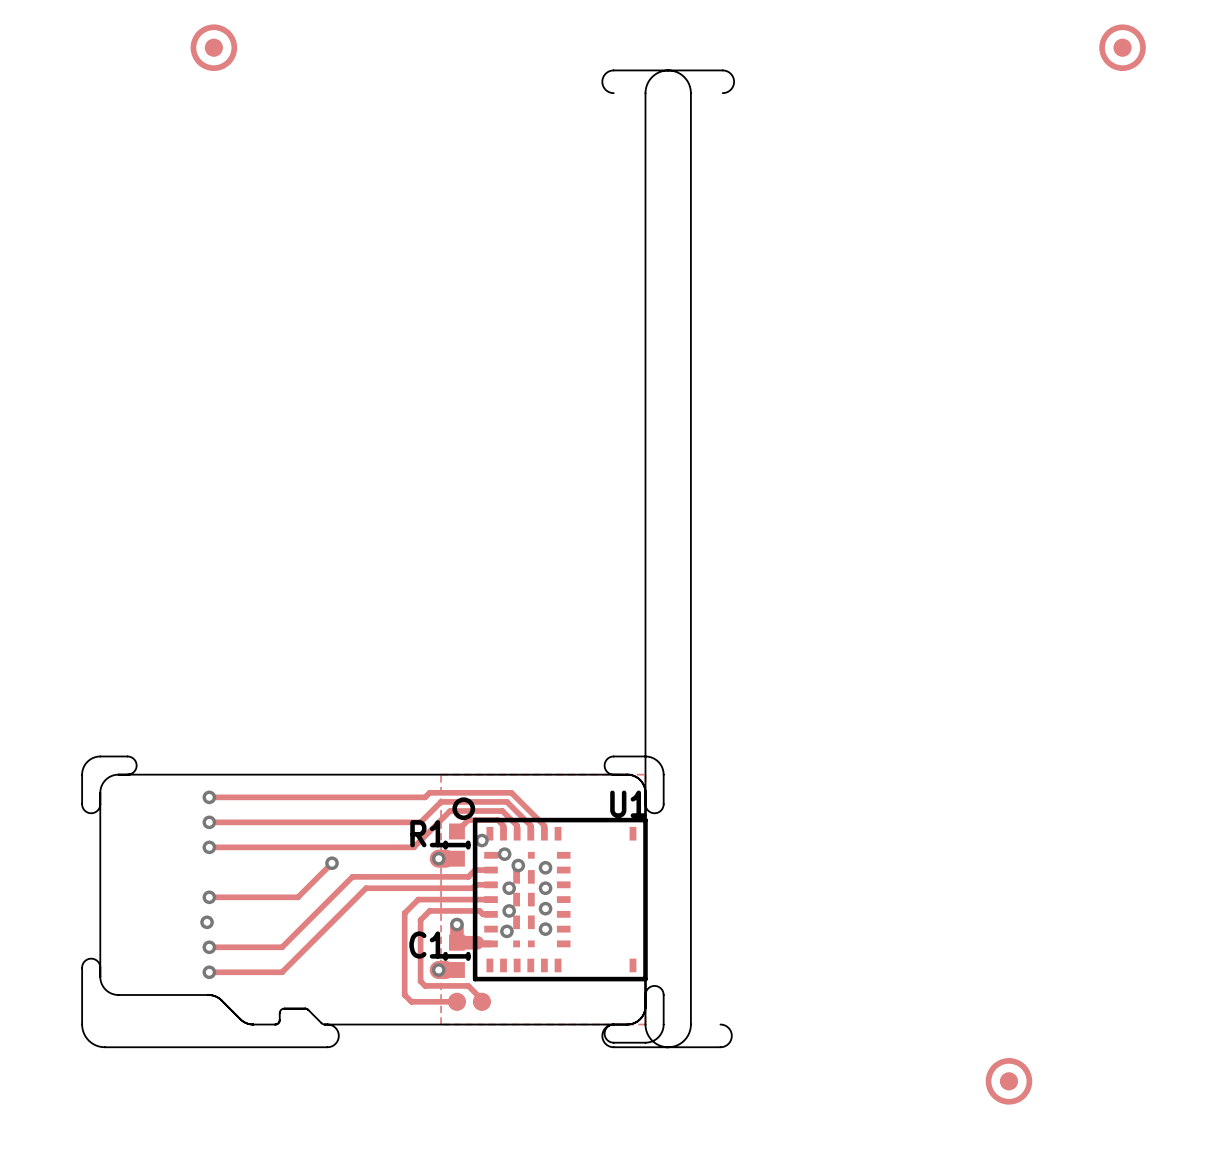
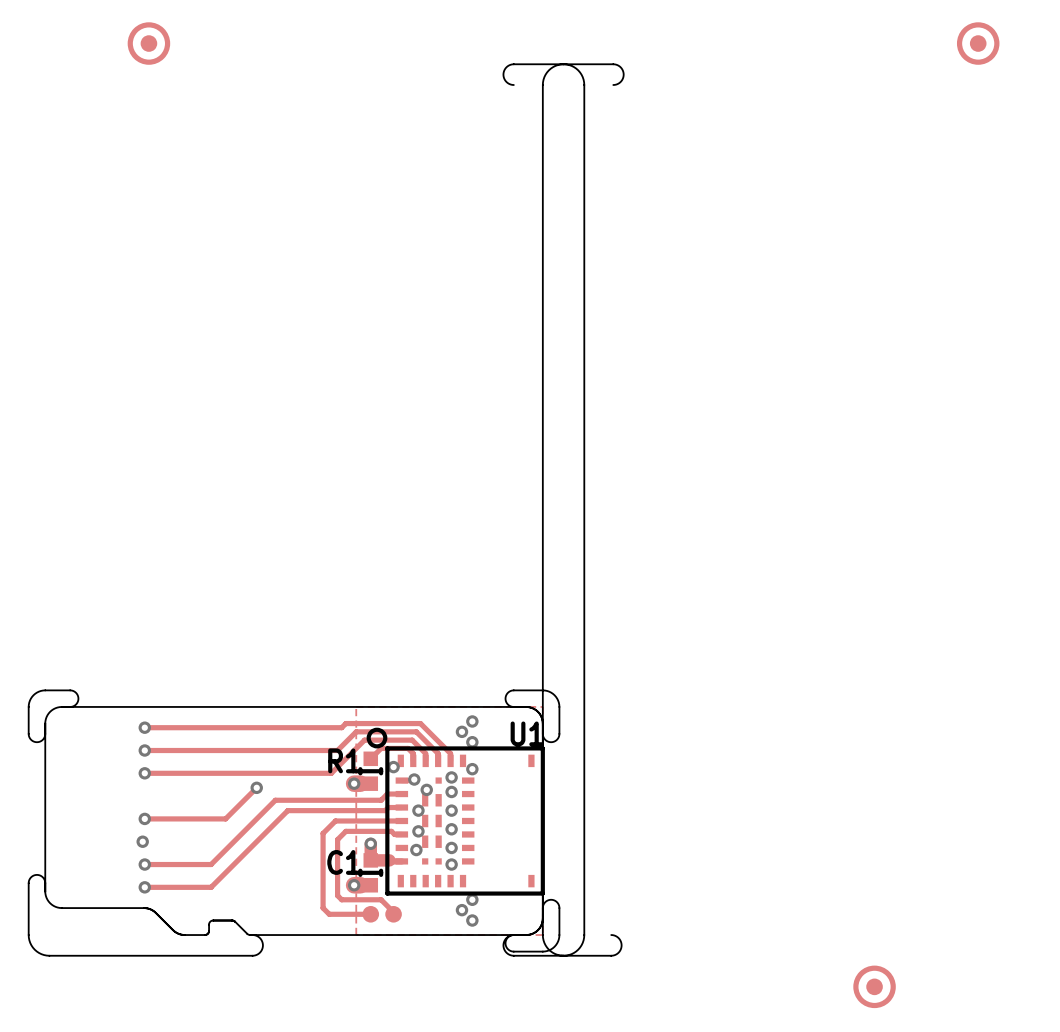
via: none -> (472, 721)
via: none -> (461, 731)
via: none -> (472, 742)
via: none -> (472, 769)
via: none -> (451, 777)
via: none -> (451, 864)
via: none -> (472, 899)
via: none -> (461, 910)
via: none -> (472, 920)

